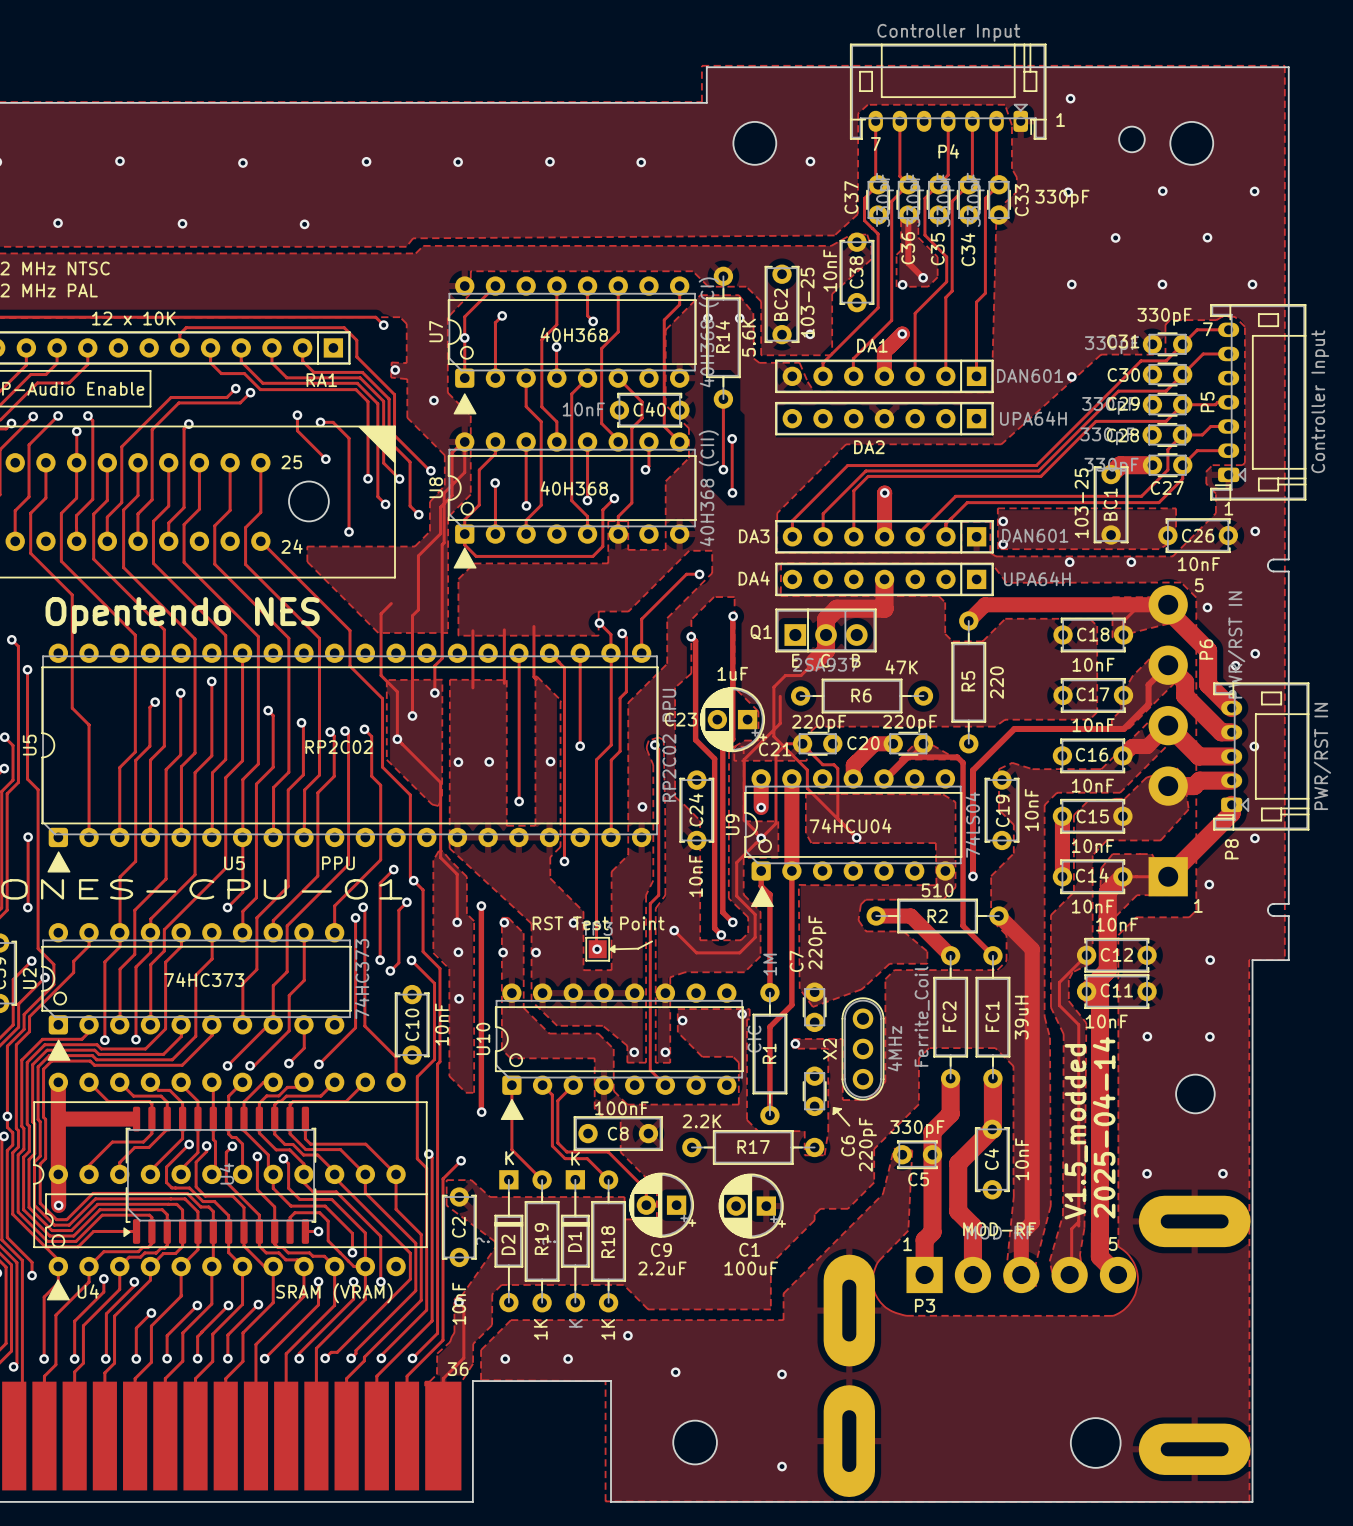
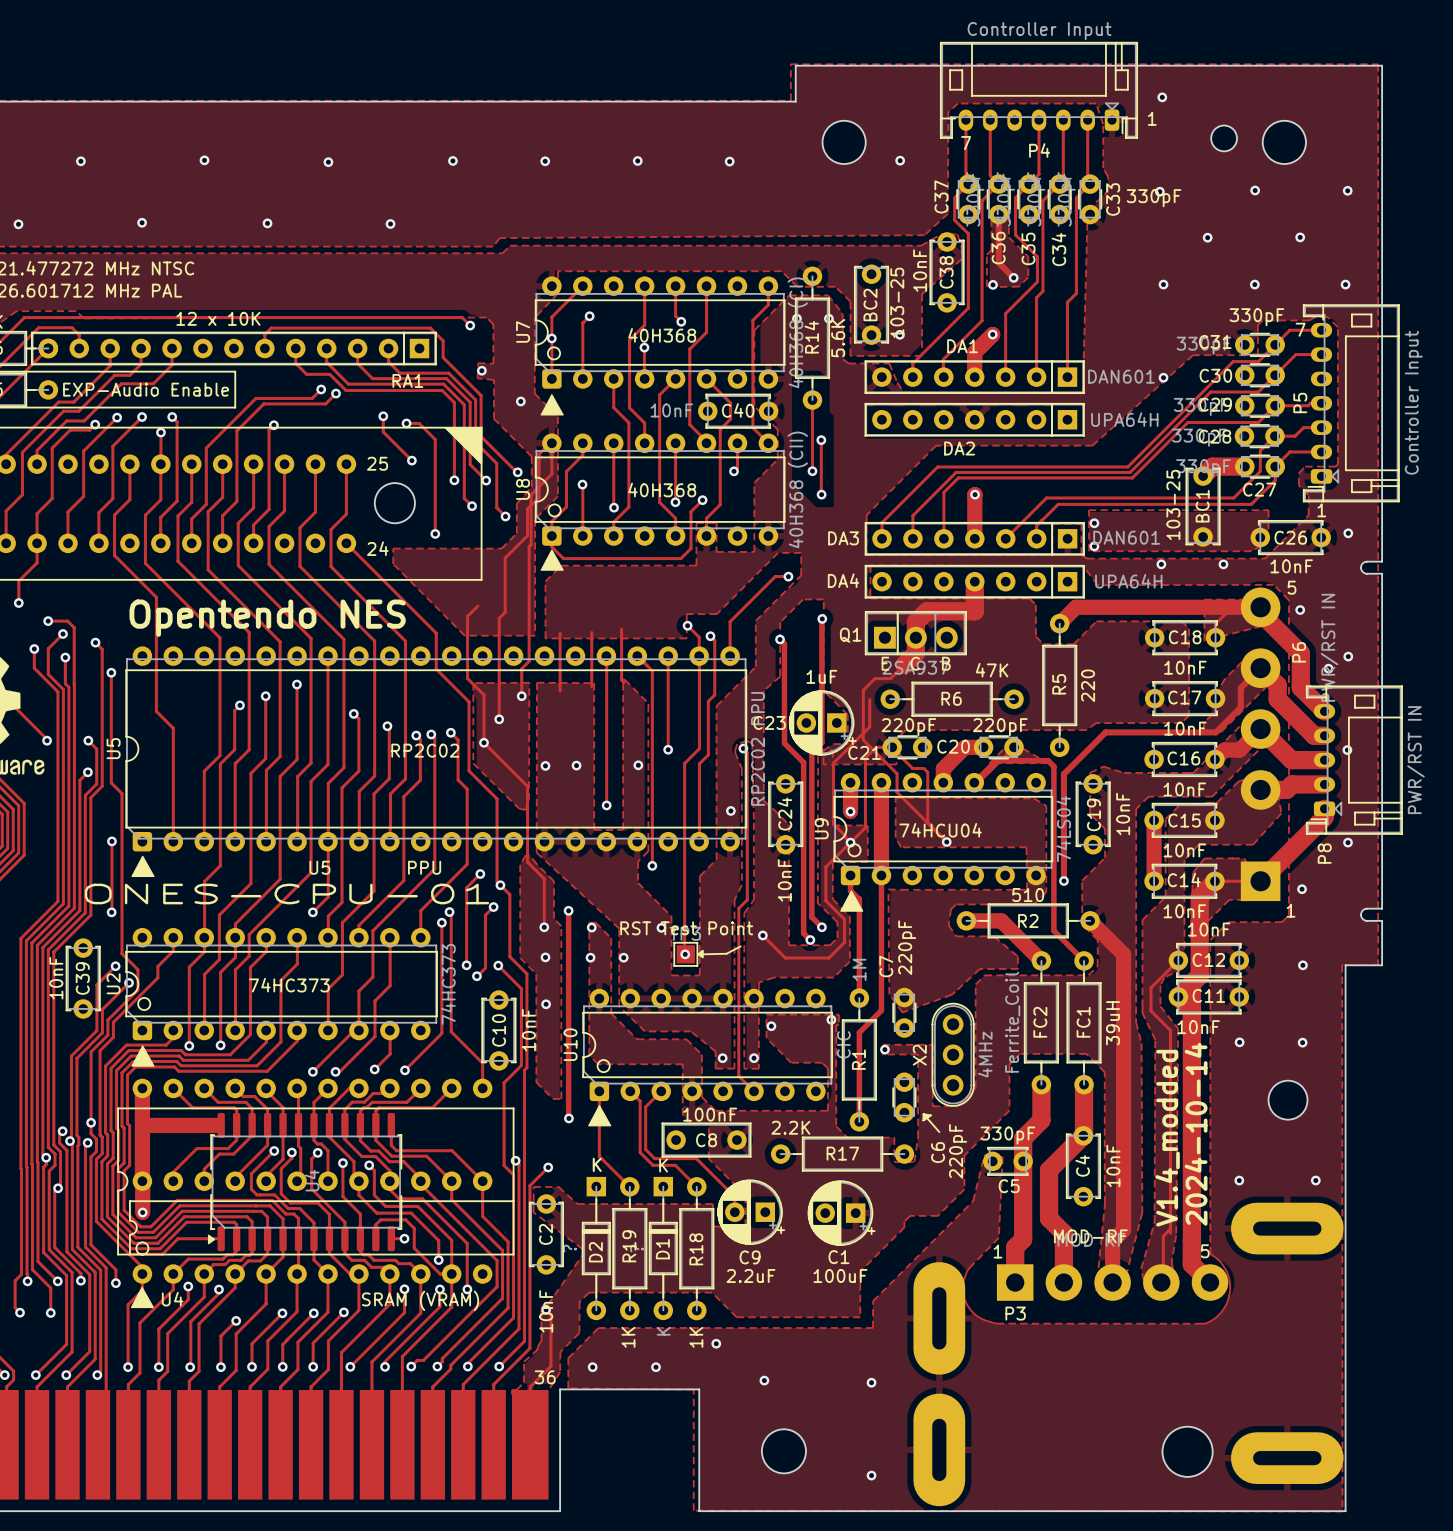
text: 2025-04-14 (1104, 1127) -> 2024-10-14 (1196, 1134)
text: V1.5_modded (1076, 1131) -> V1.4_modded (1167, 1138)

